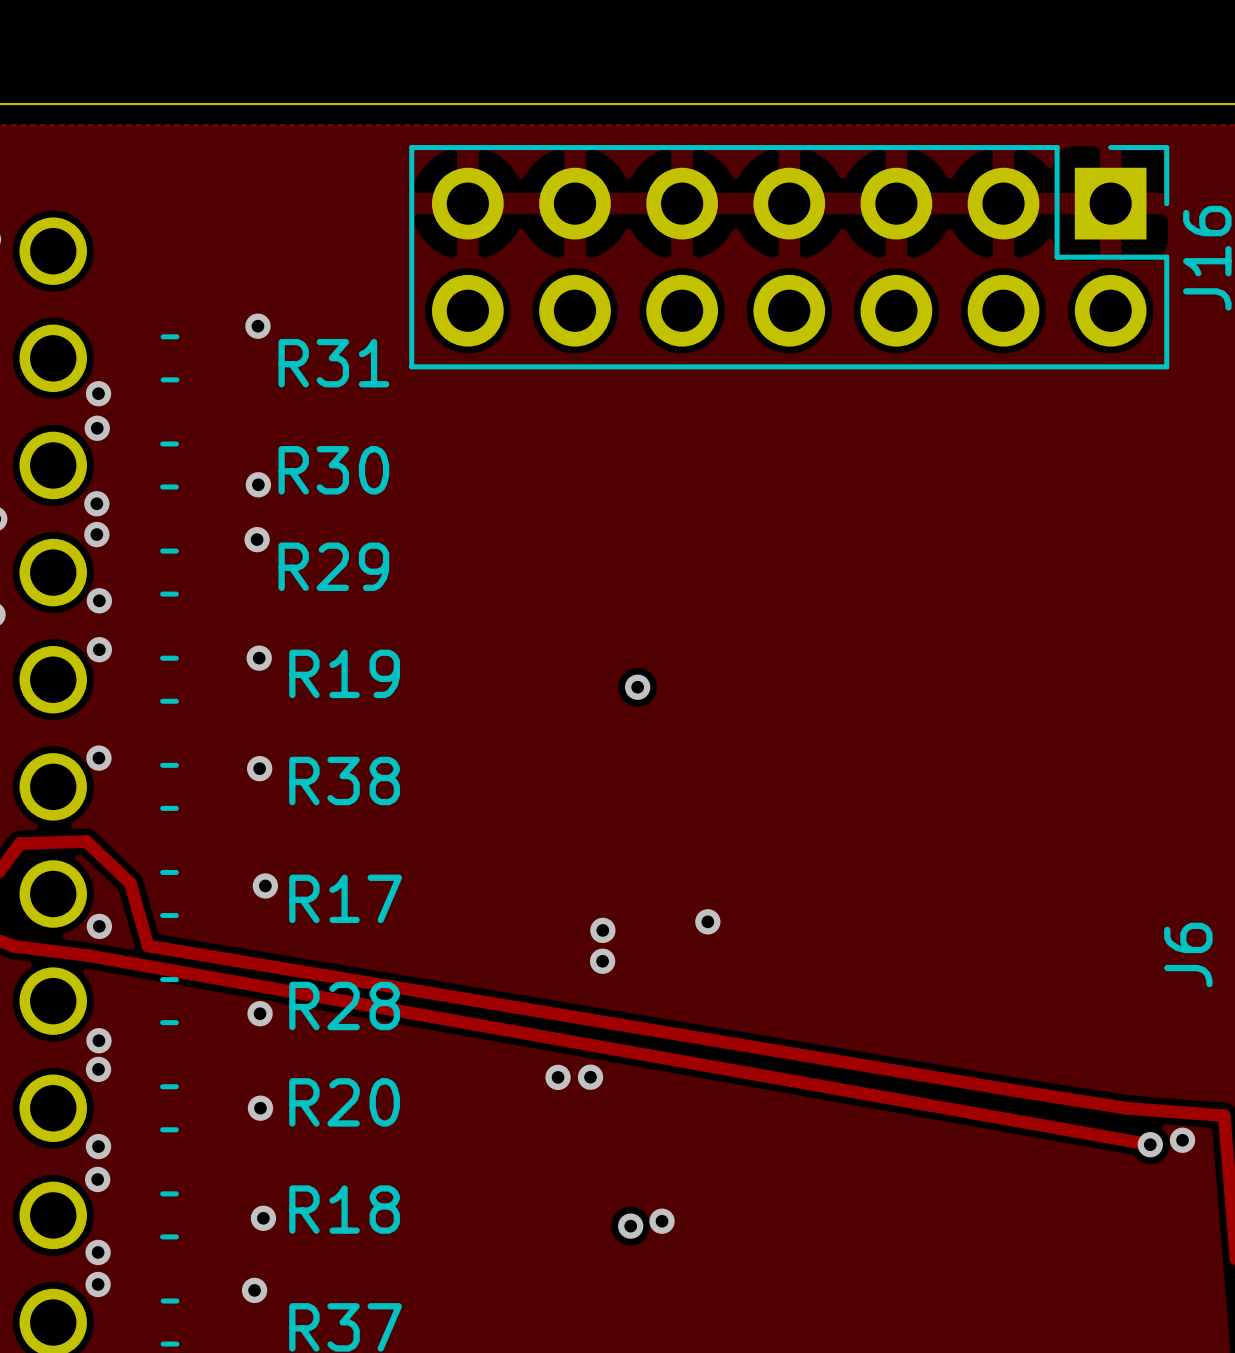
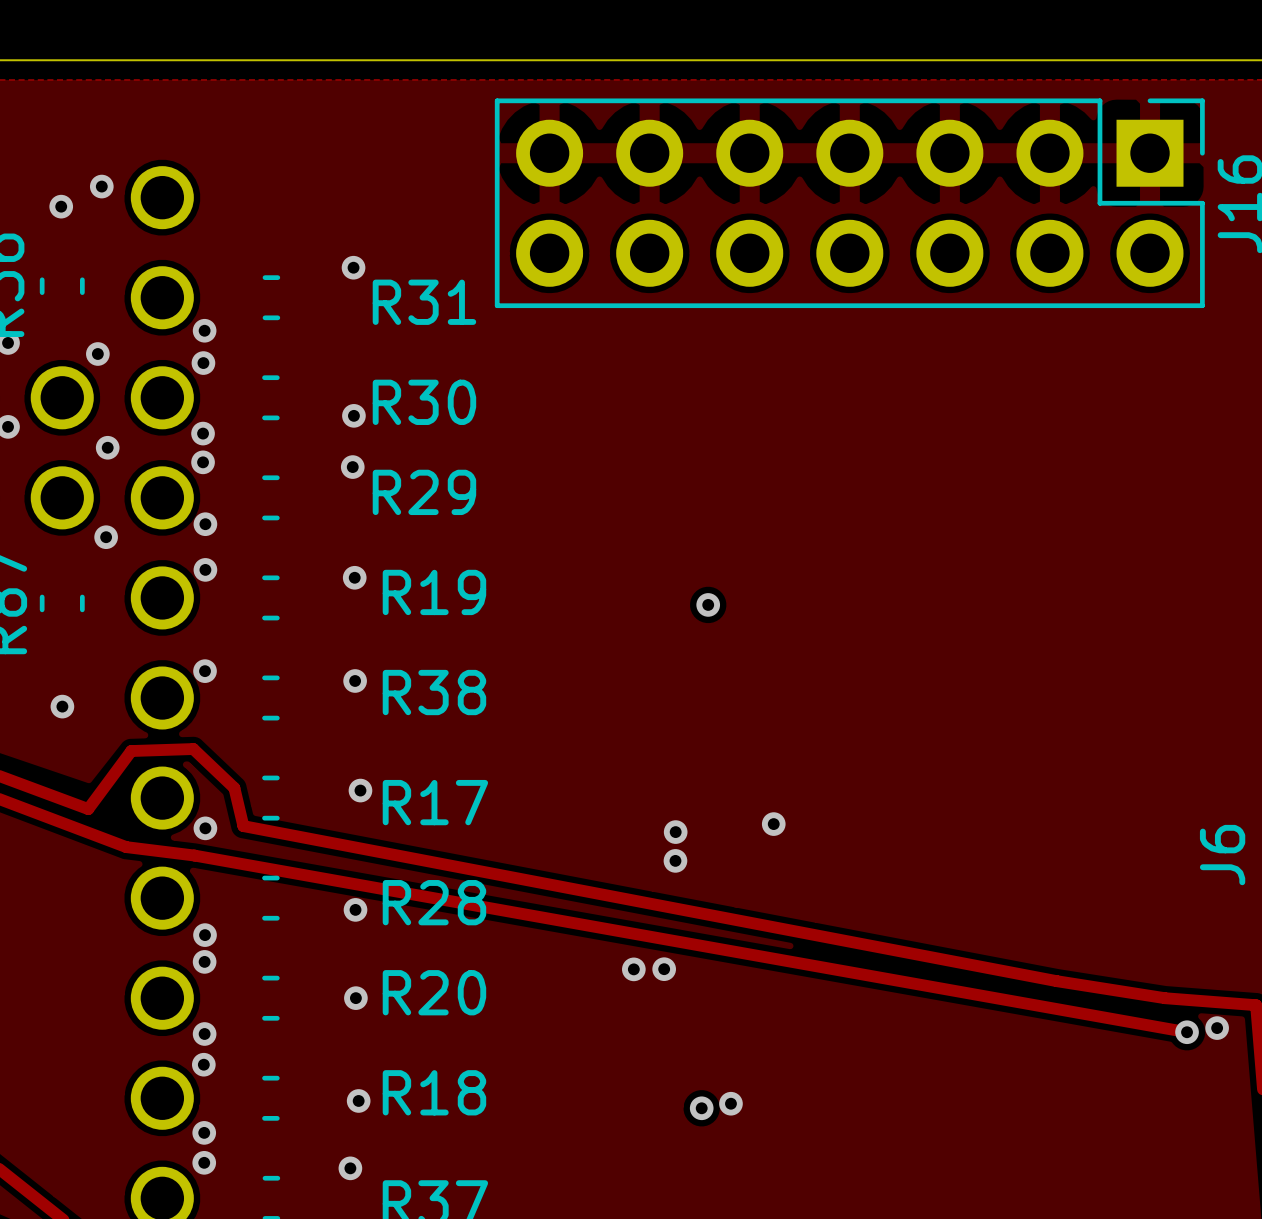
track: (130, 883) (148, 945) (1011, 1090) -> (234, 788) (243, 826) (1056, 981)

